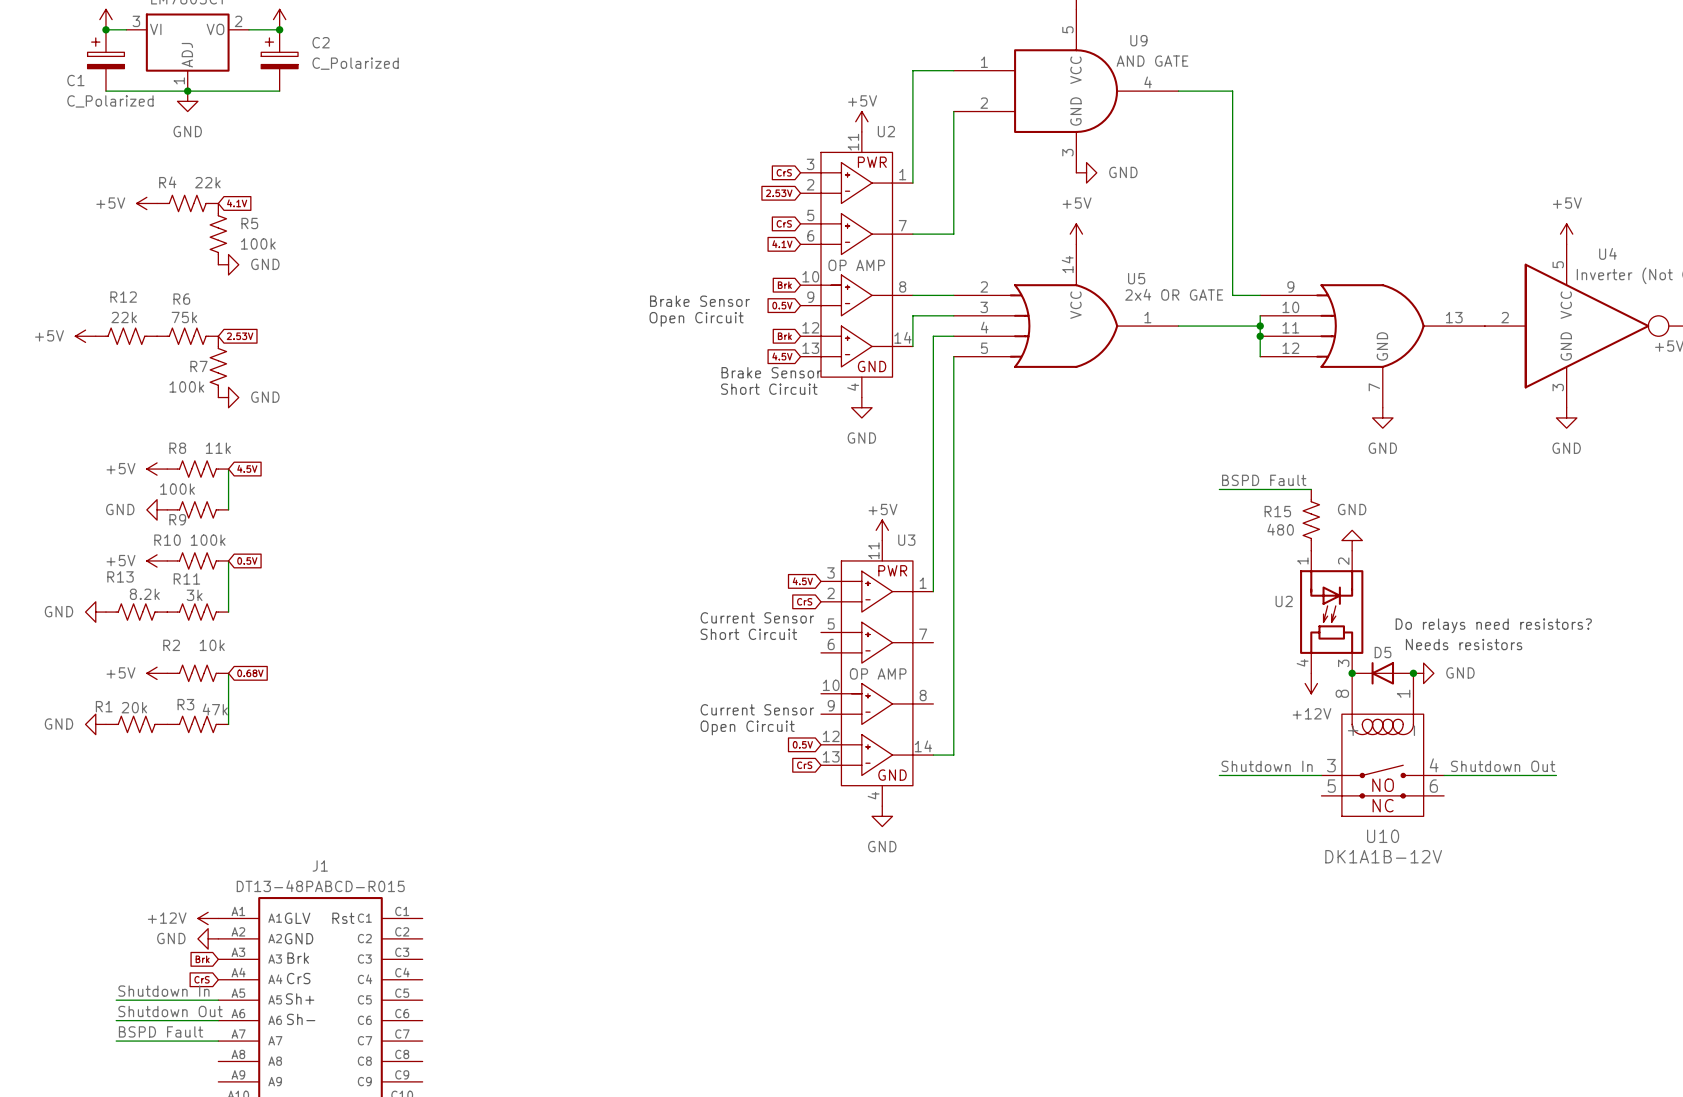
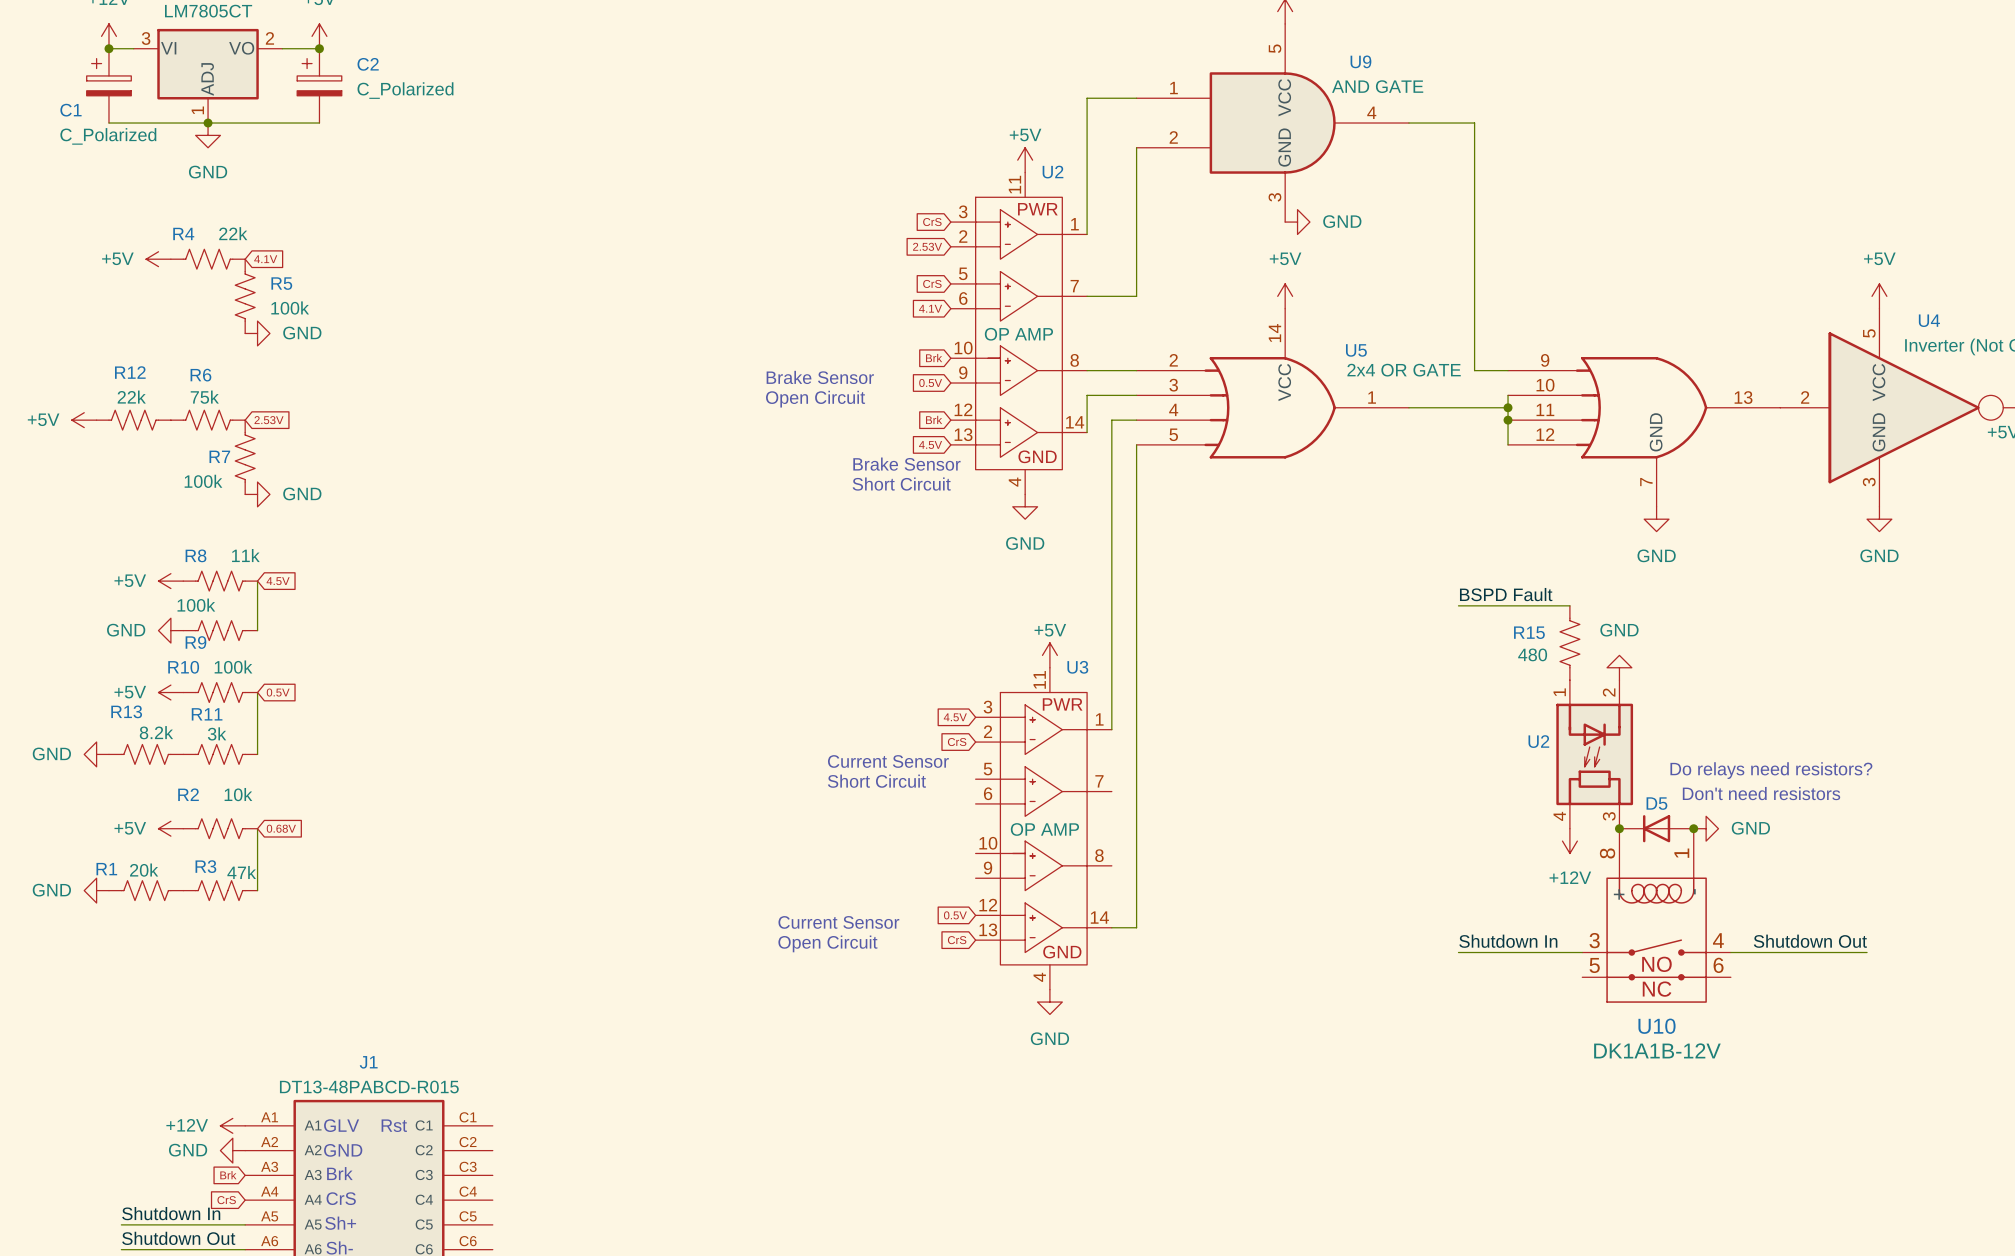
text: Needs resistors (1464, 644) -> Don't need resistors (1761, 793)
text position: Current Sensor (757, 709) -> Current Sensor (838, 922)
text position: Open Circuit (747, 727) -> Open Circuit (827, 943)

